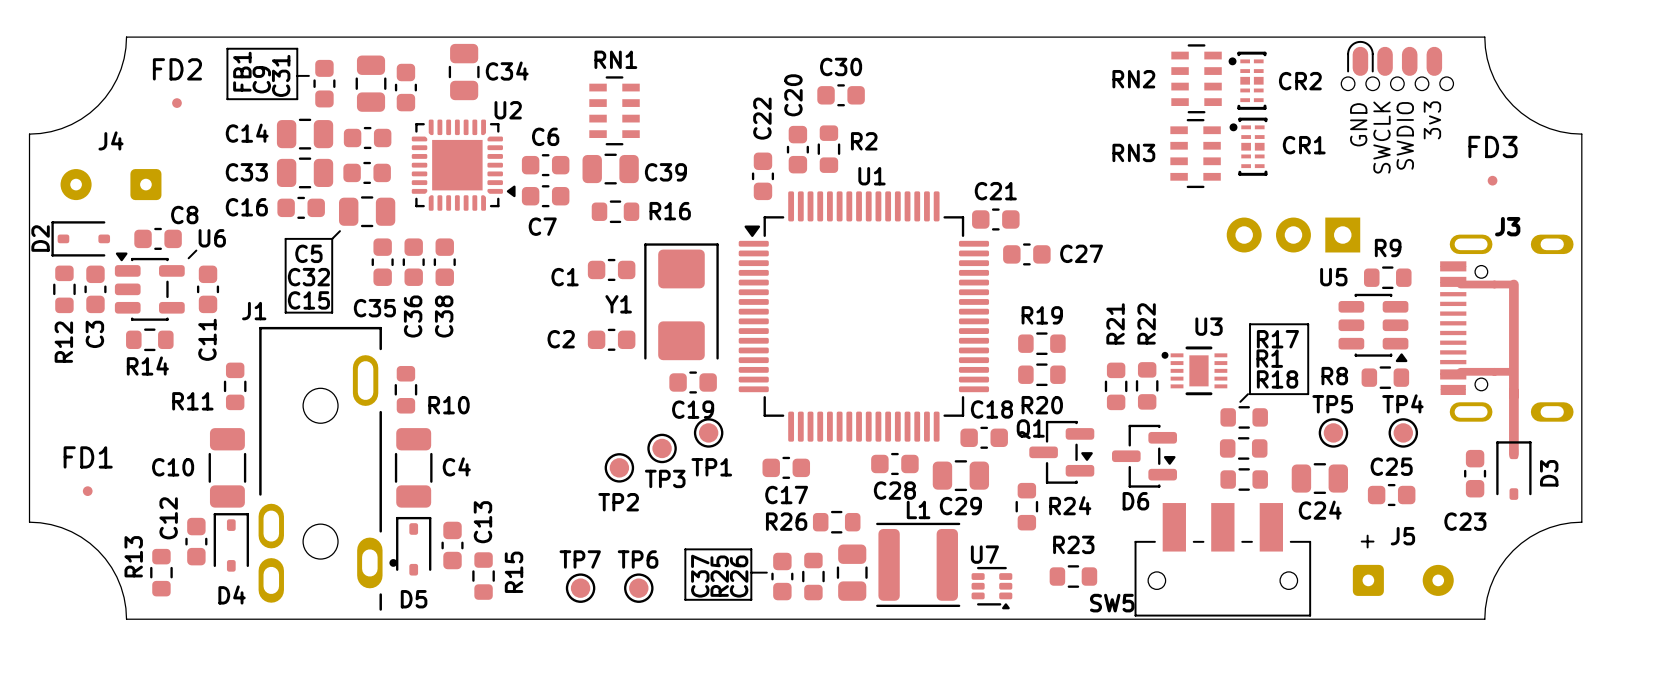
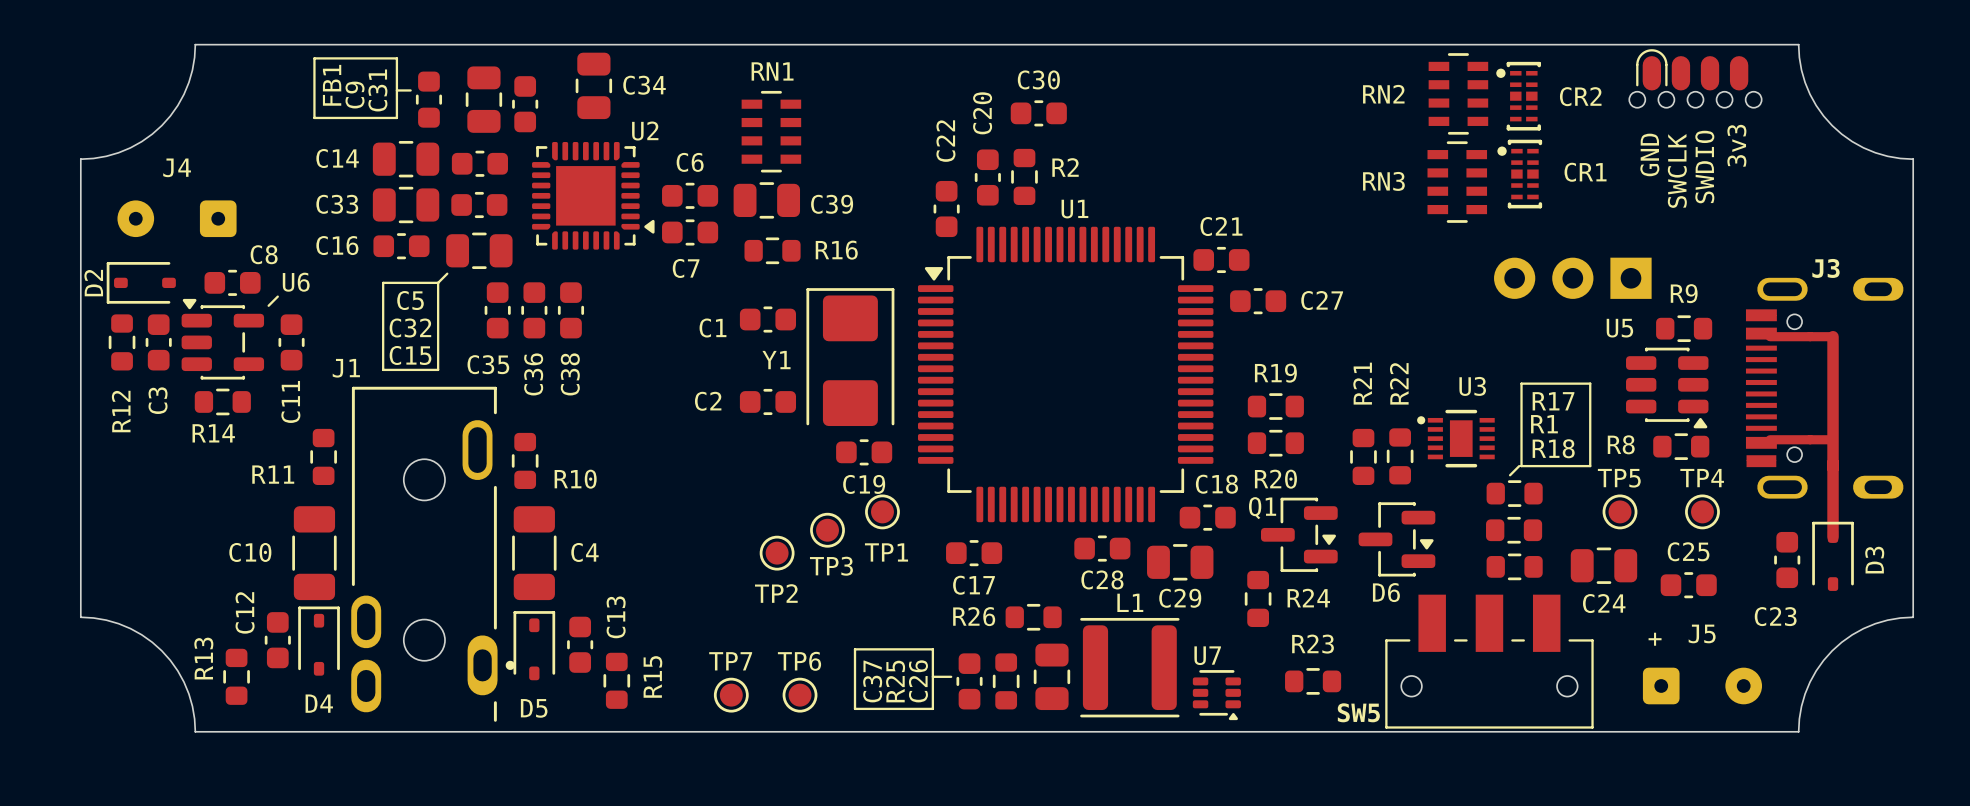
FD2: (176, 103) -> none
FD3: (1492, 180) -> none
FD1: (87, 491) -> none

